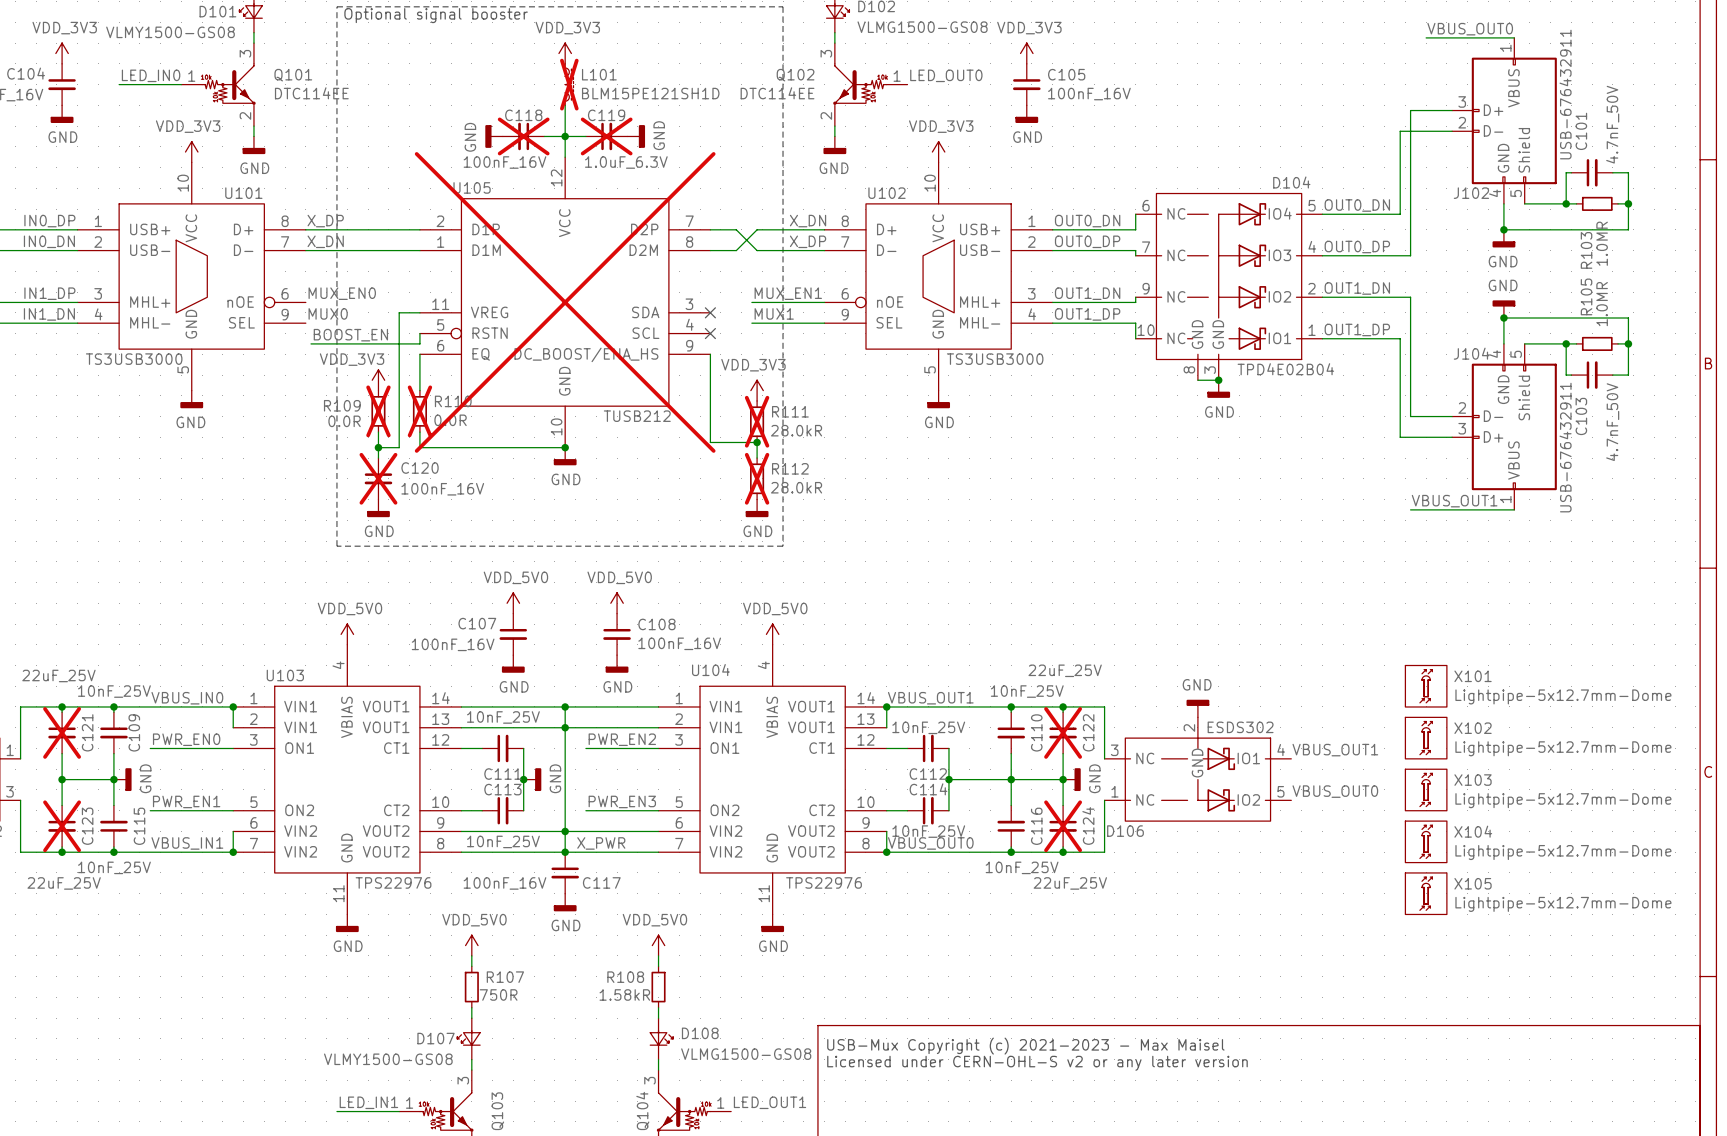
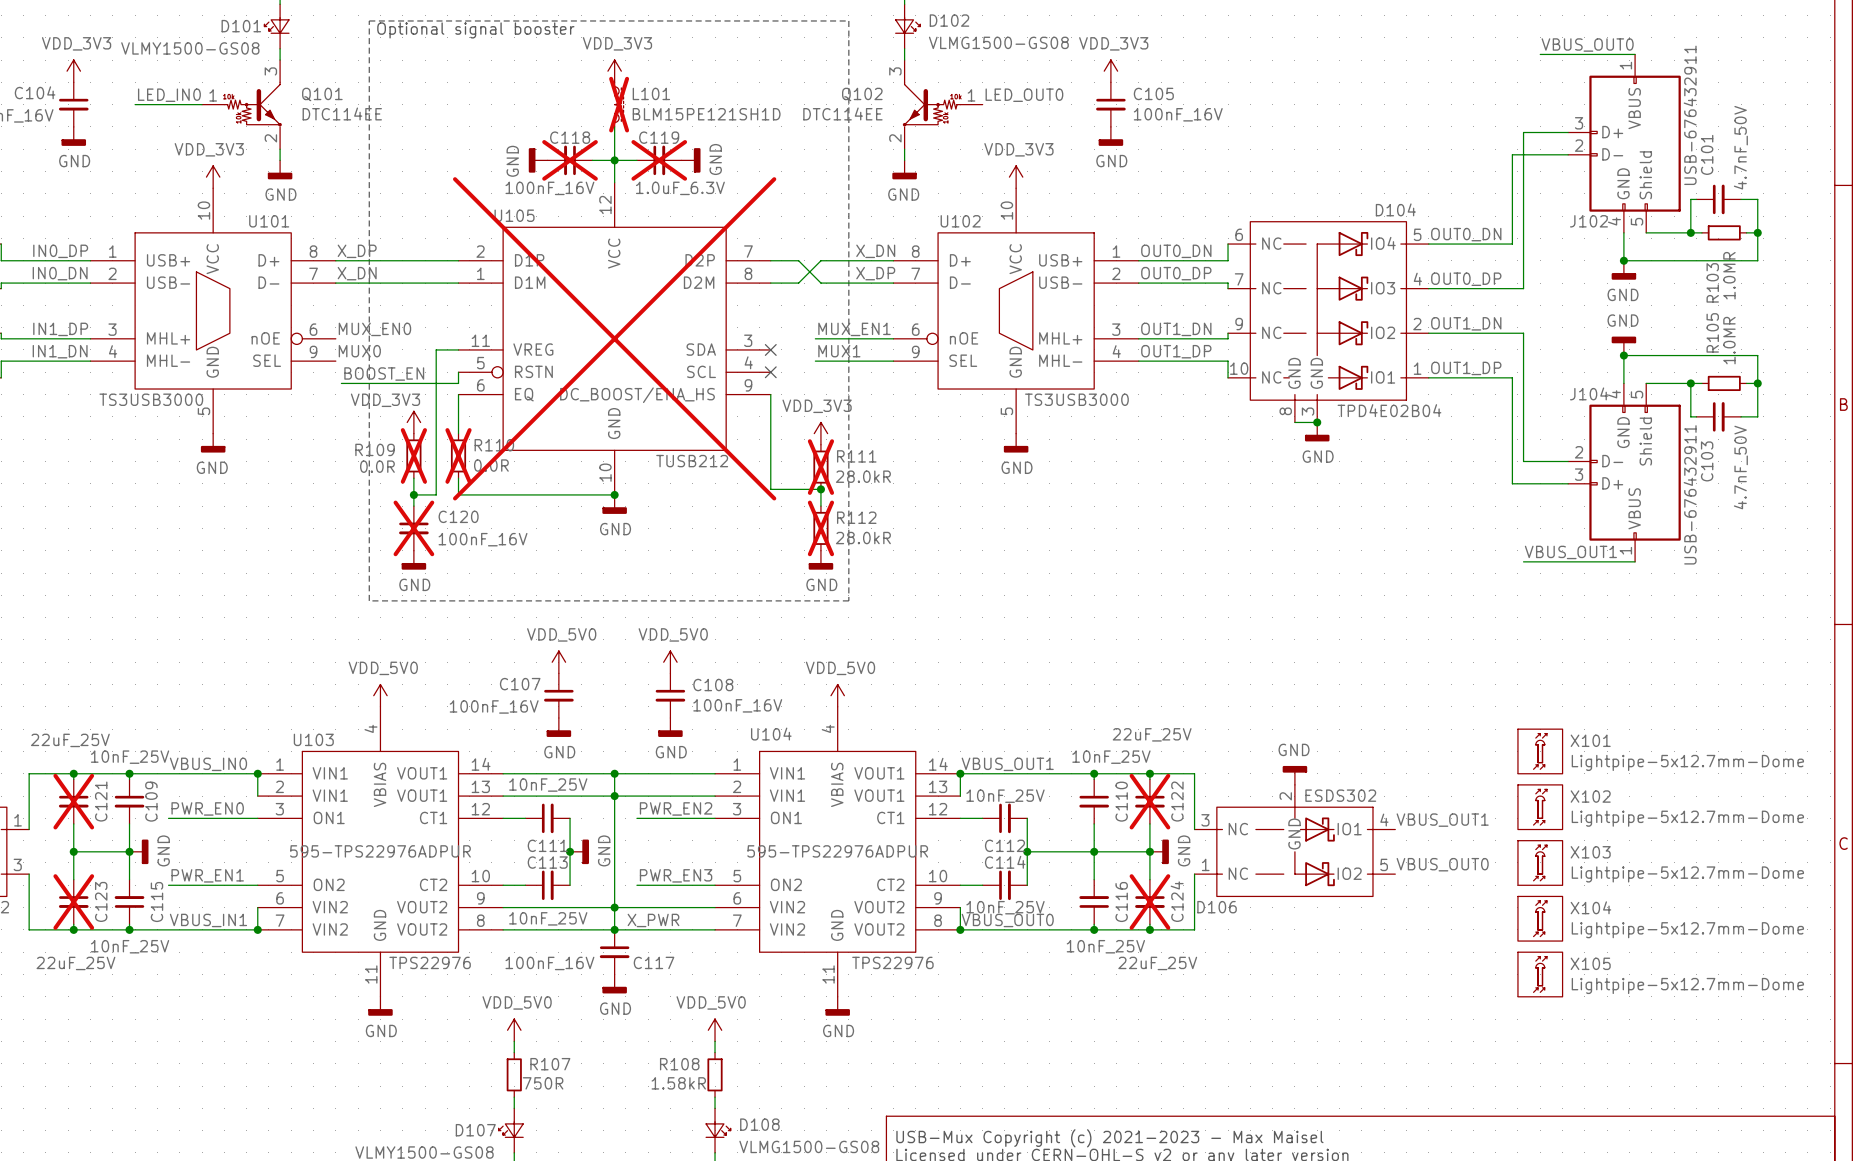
U103 text: none -> 595-TPS22976ADPUR (380, 851)
U104 text: none -> 595-TPS22976ADPUR (837, 851)

